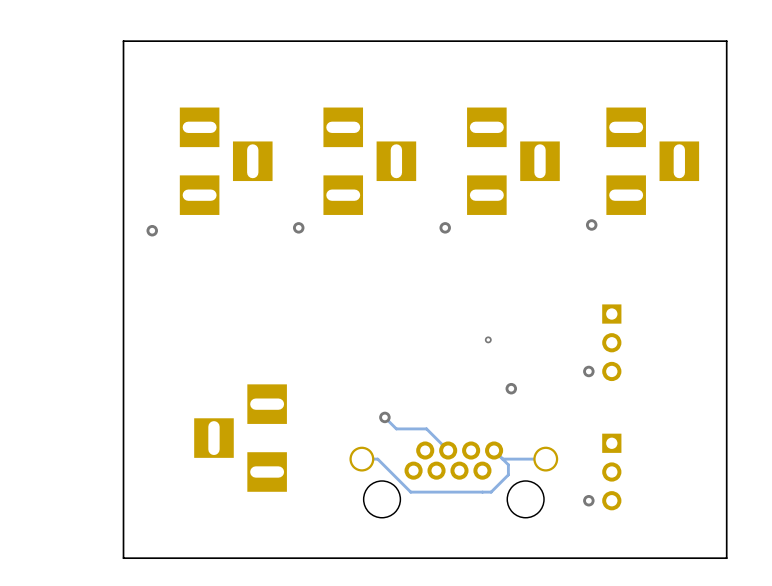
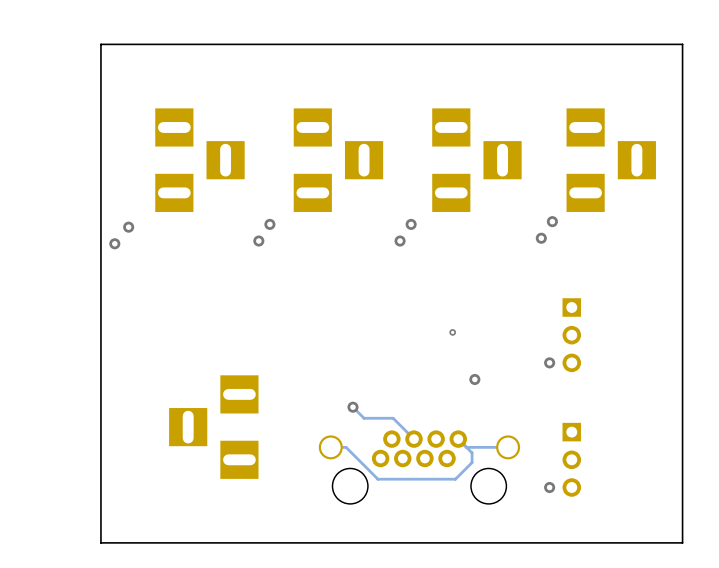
via: none -> (541, 238)
via: none -> (258, 241)
via: none -> (400, 241)
via: none -> (114, 243)

